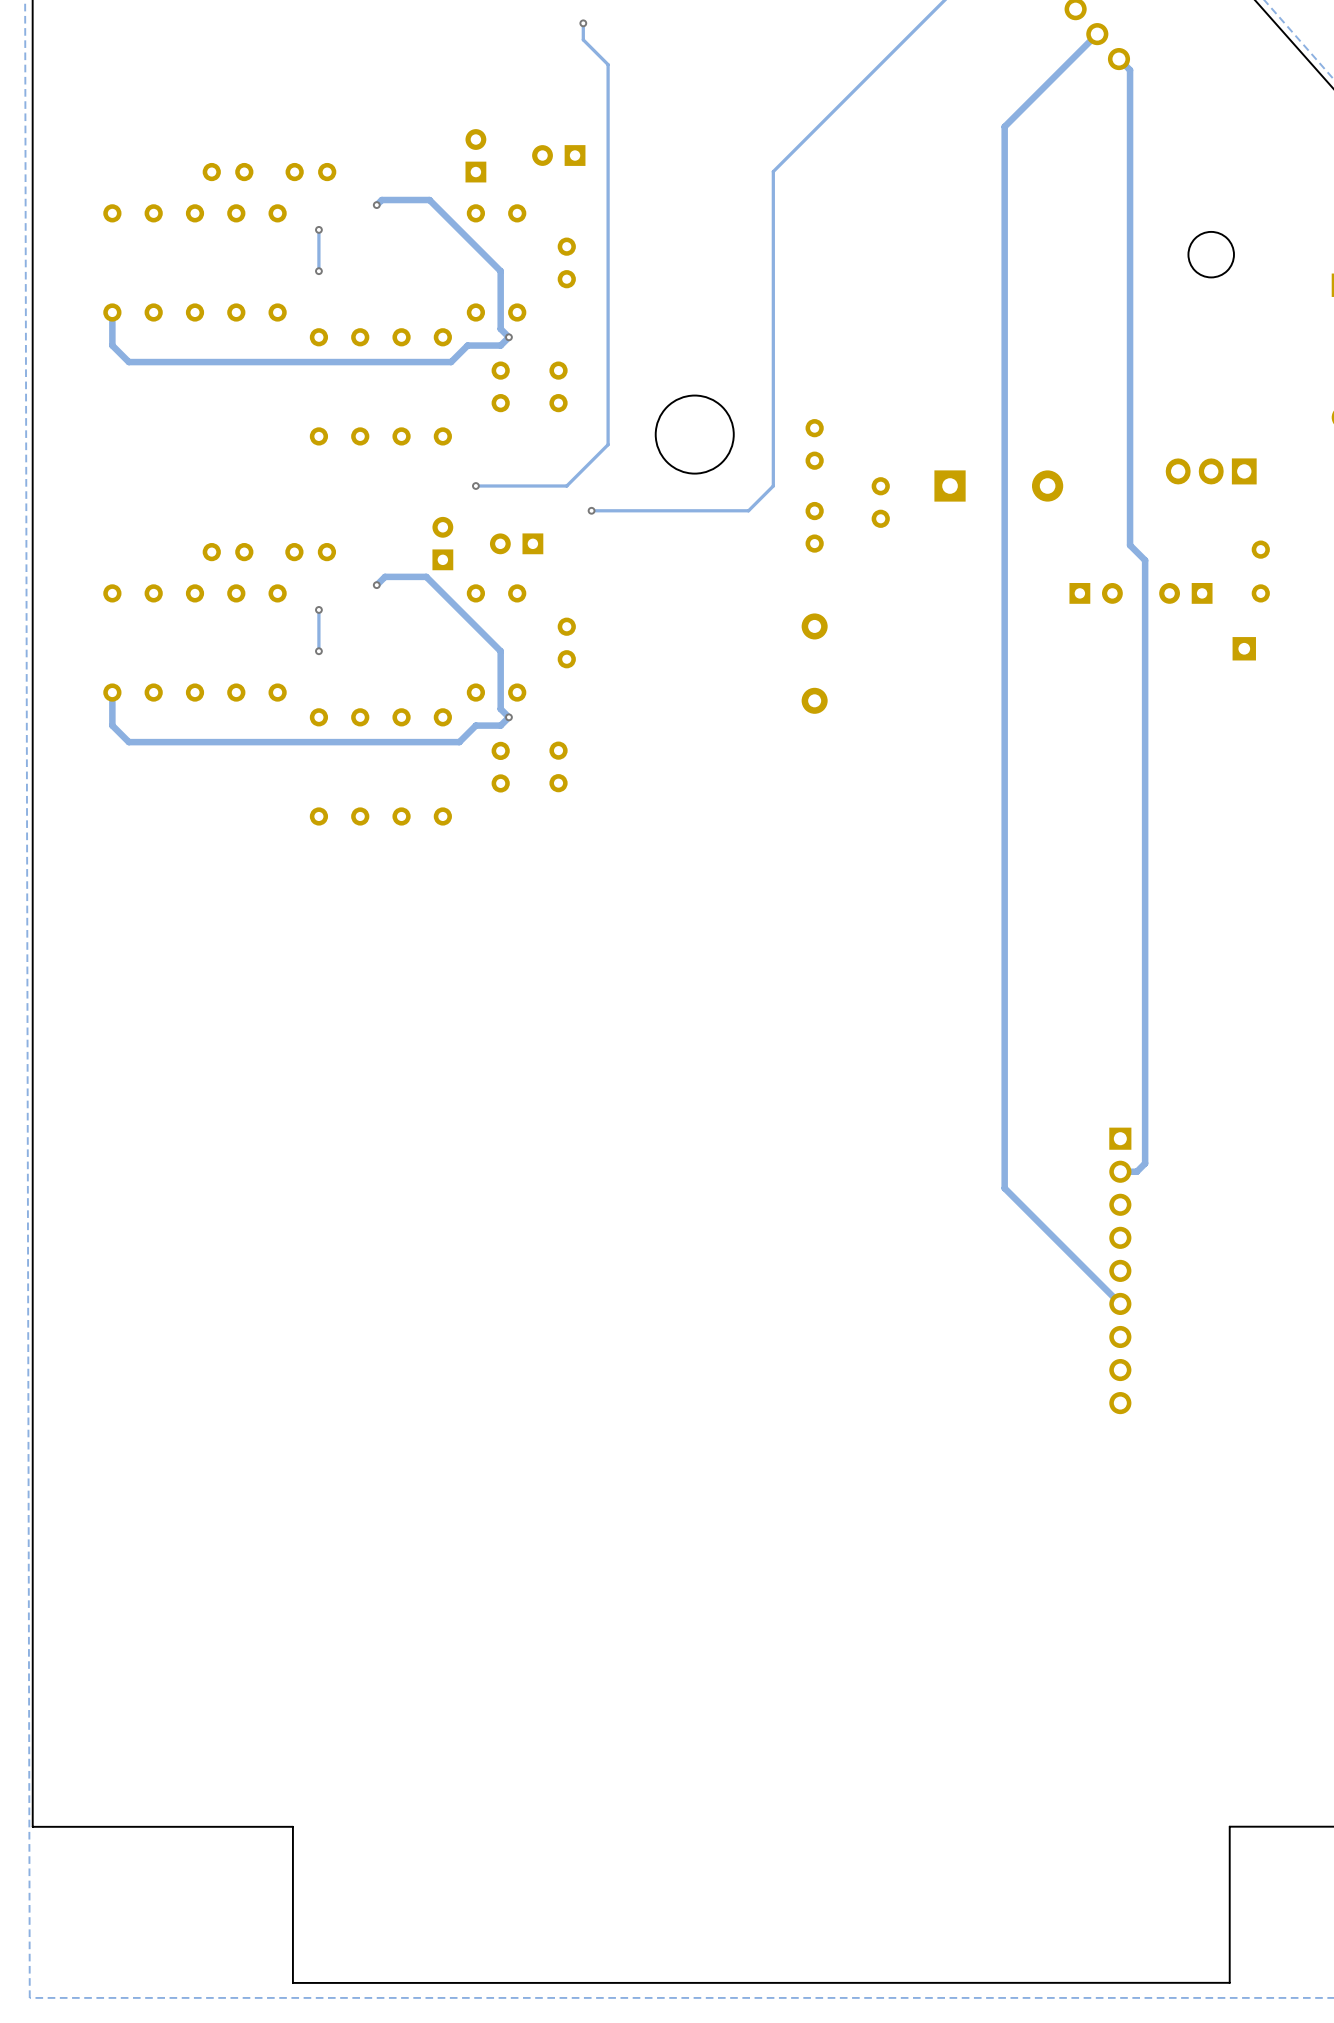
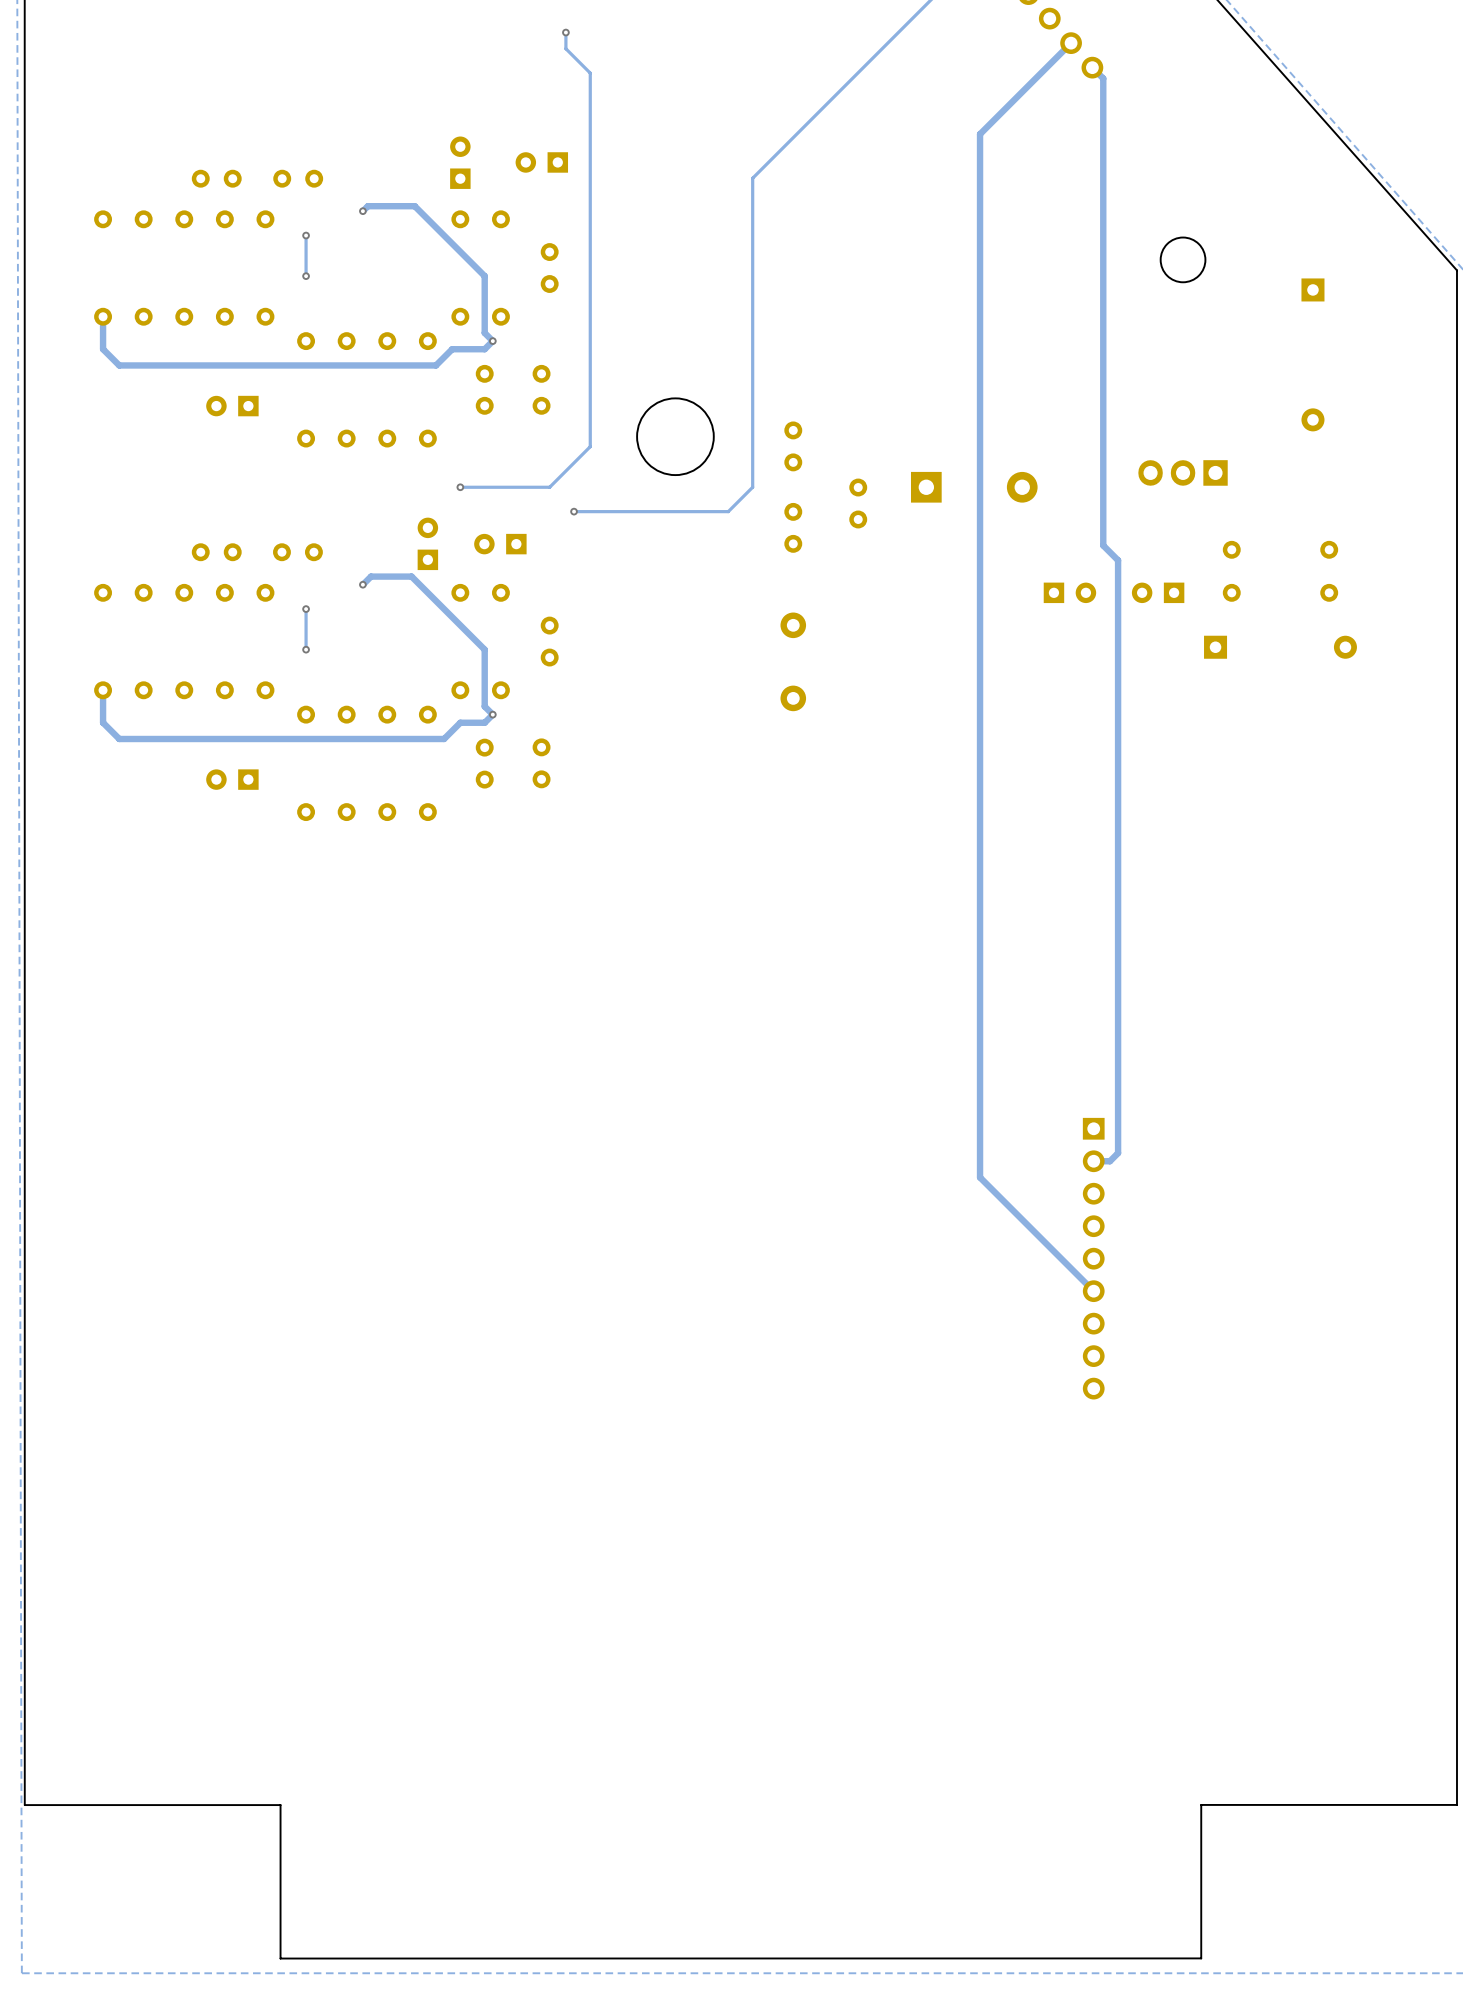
part: none -> (232, 406)
part: none -> (232, 779)

